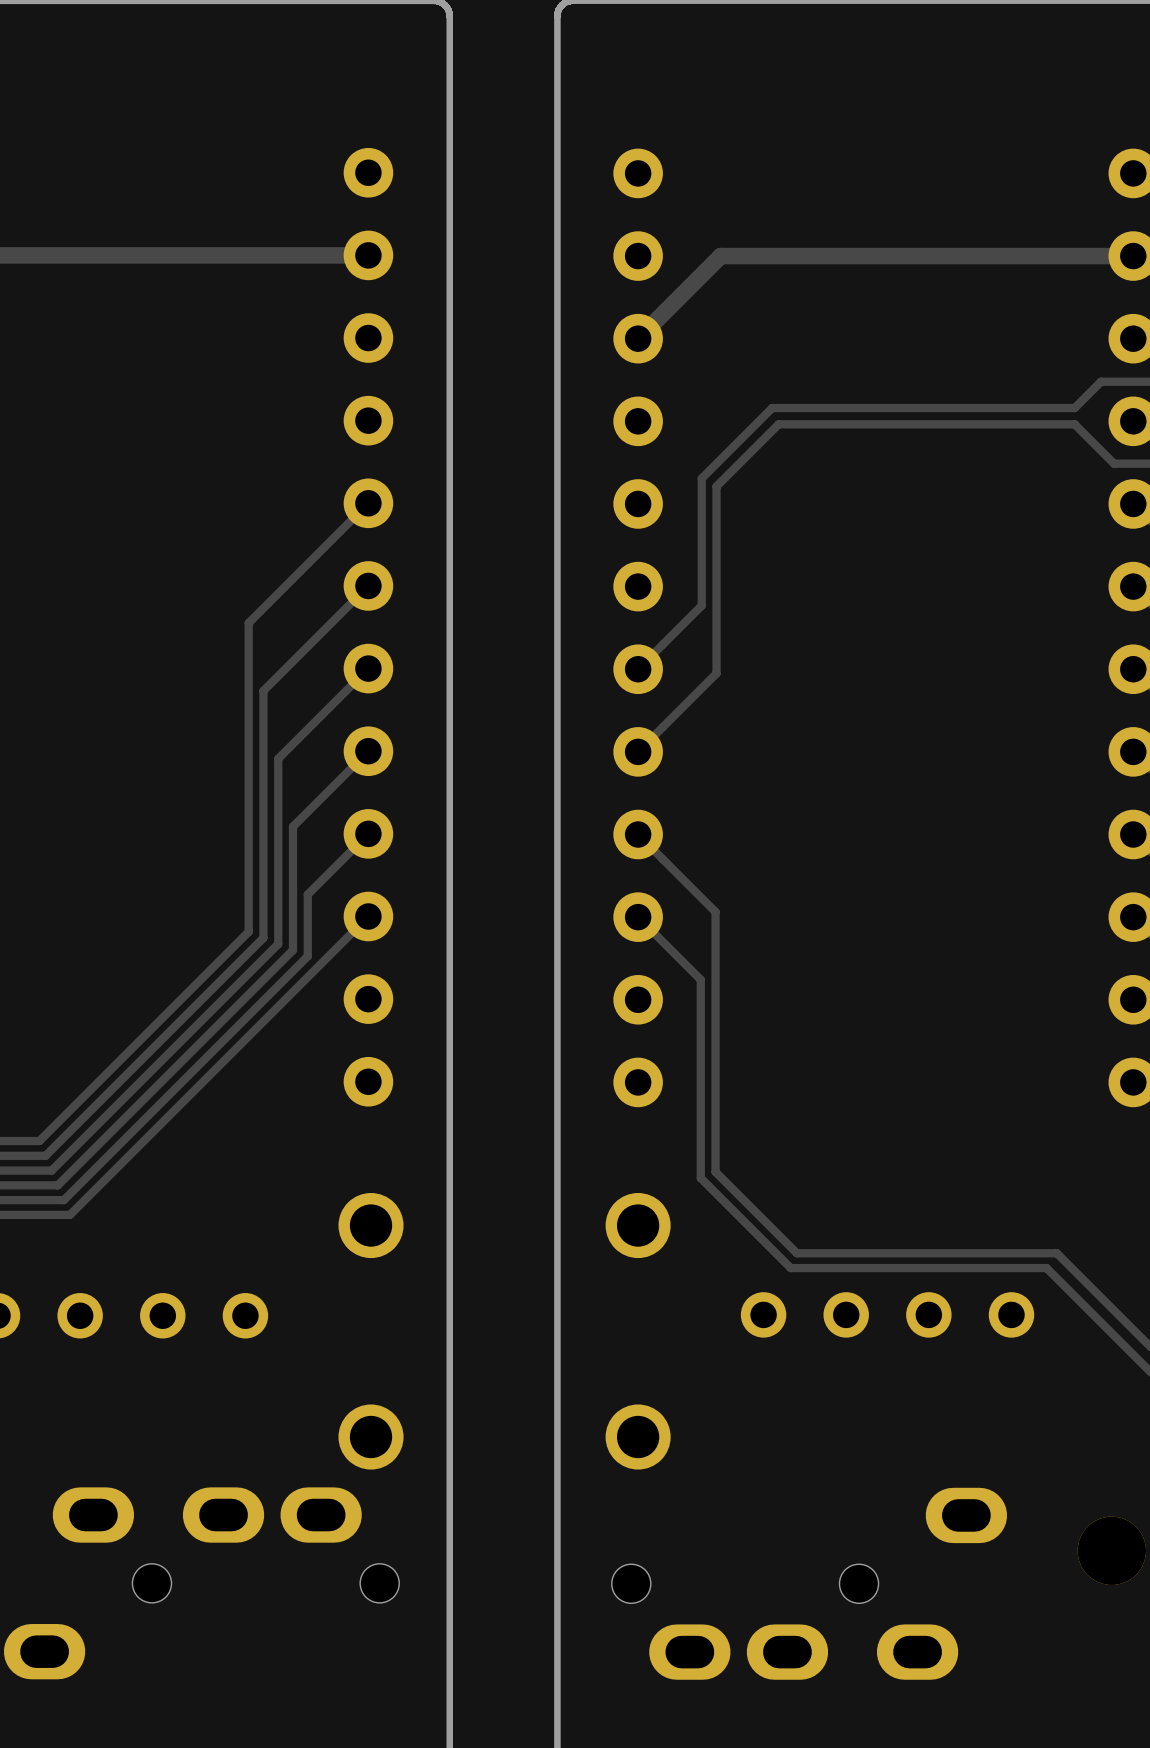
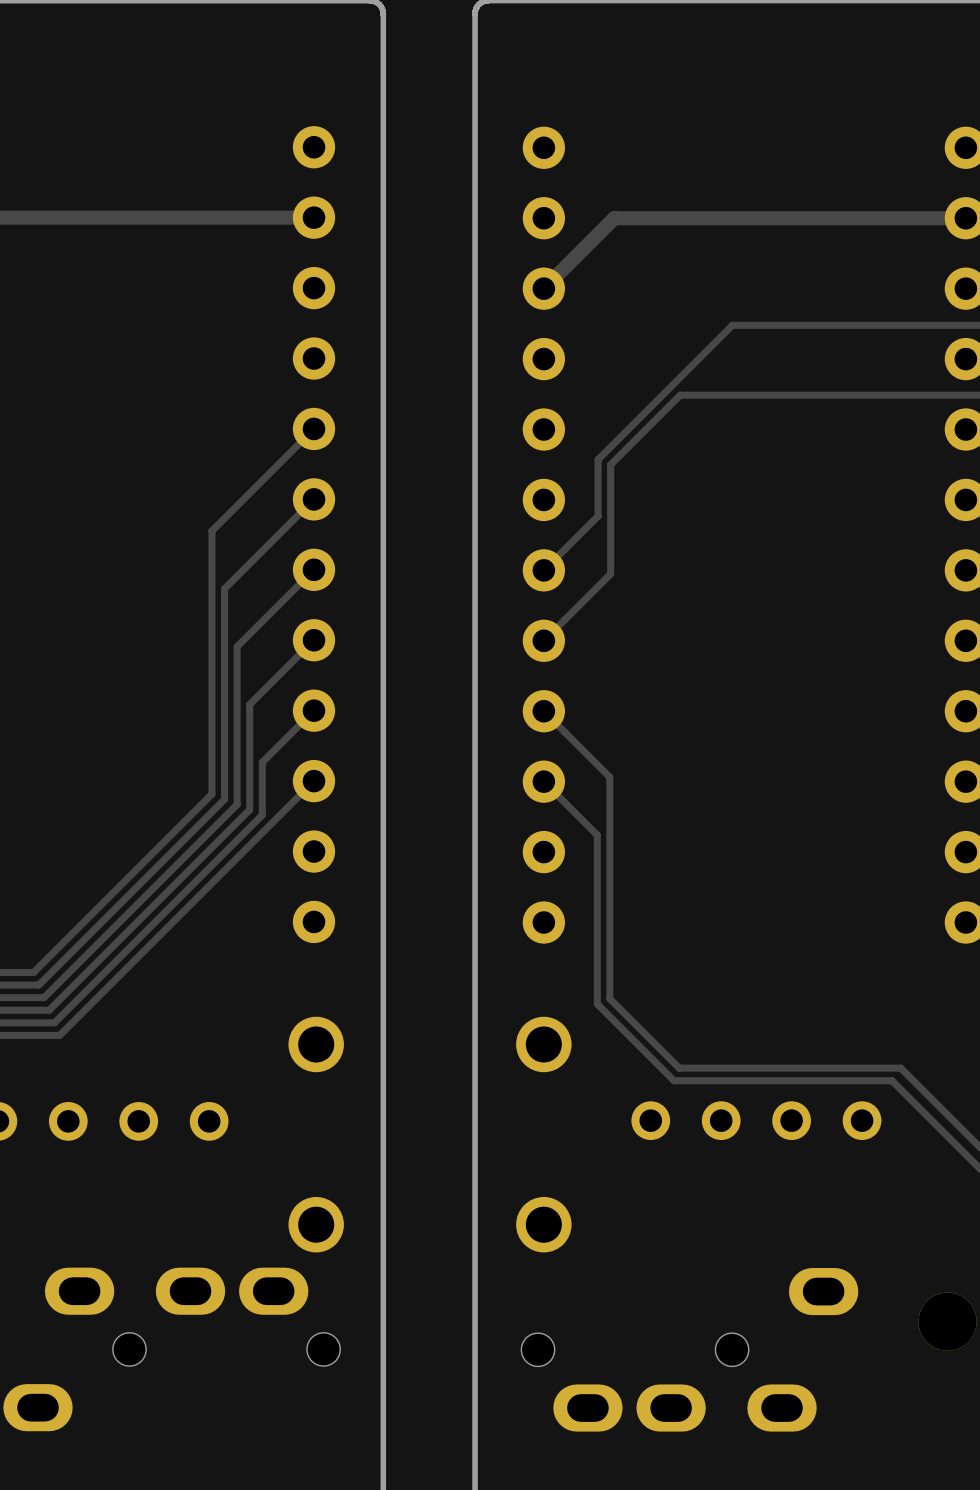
track: (1101, 381) (1074, 408) (772, 408) (701, 478) (701, 539) -> (938, 325) (732, 325) (598, 459)
track: (1114, 463) (1074, 424) (778, 424) (716, 486) (716, 545) -> (949, 395) (680, 395) (610, 464)

